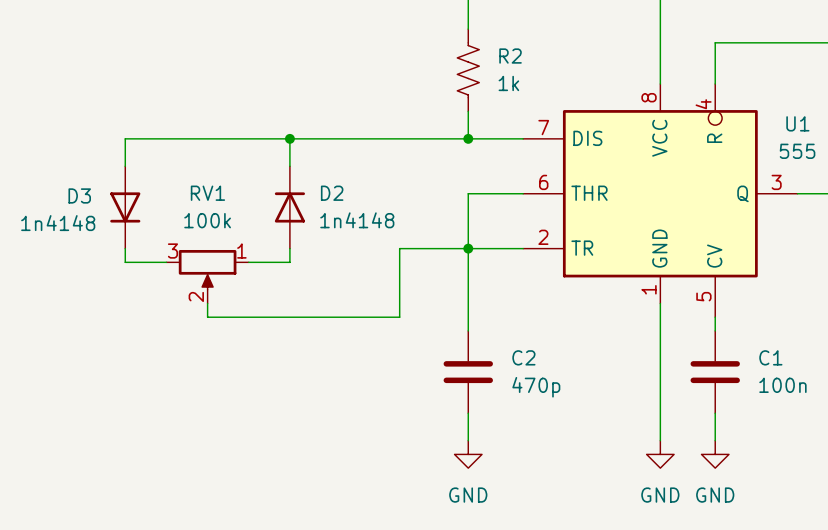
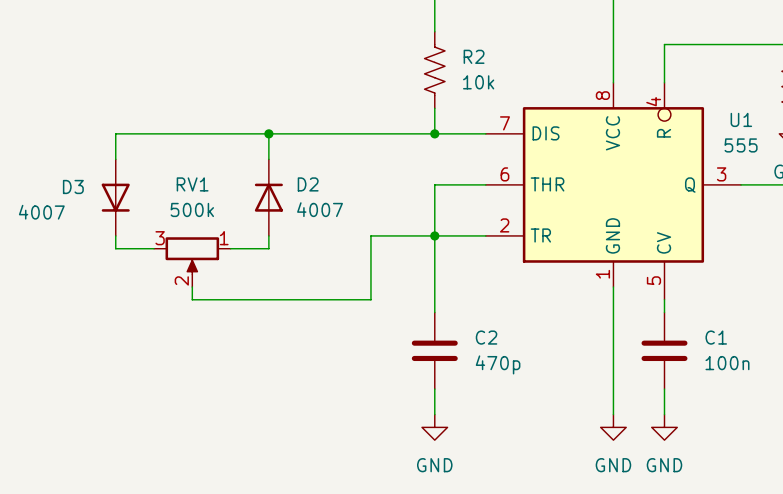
R2 value: 1k (508, 83) -> 10k (478, 82)
RV1 value: 100k (207, 220) -> 500k (192, 209)
D2 value: 1n4148 (357, 220) -> 4007 (320, 209)
D3 value: 1n4148 (58, 223) -> 4007 (41, 212)

